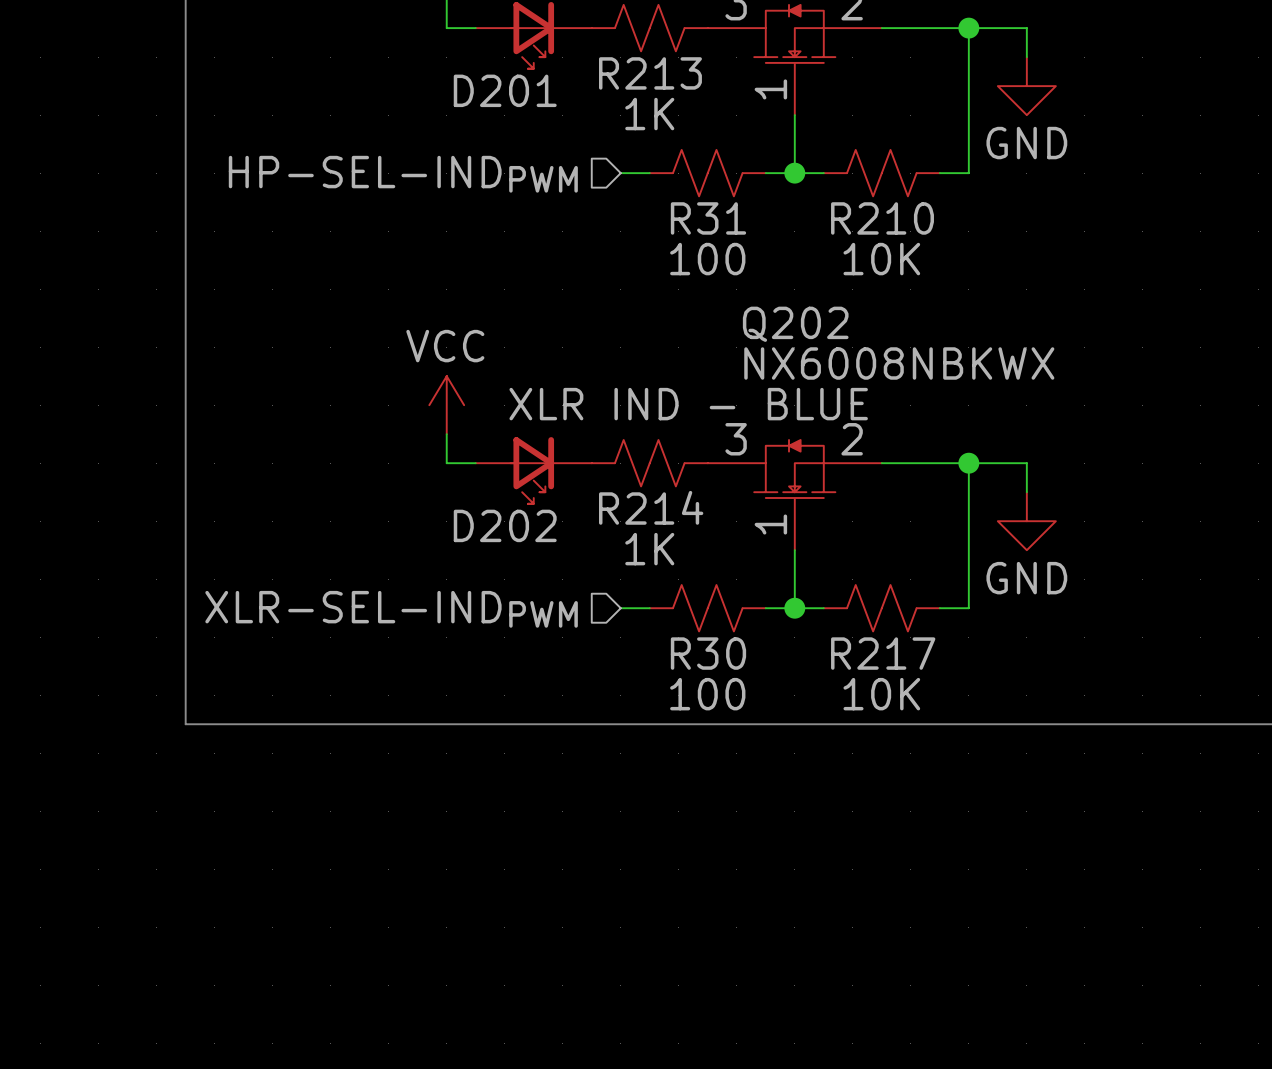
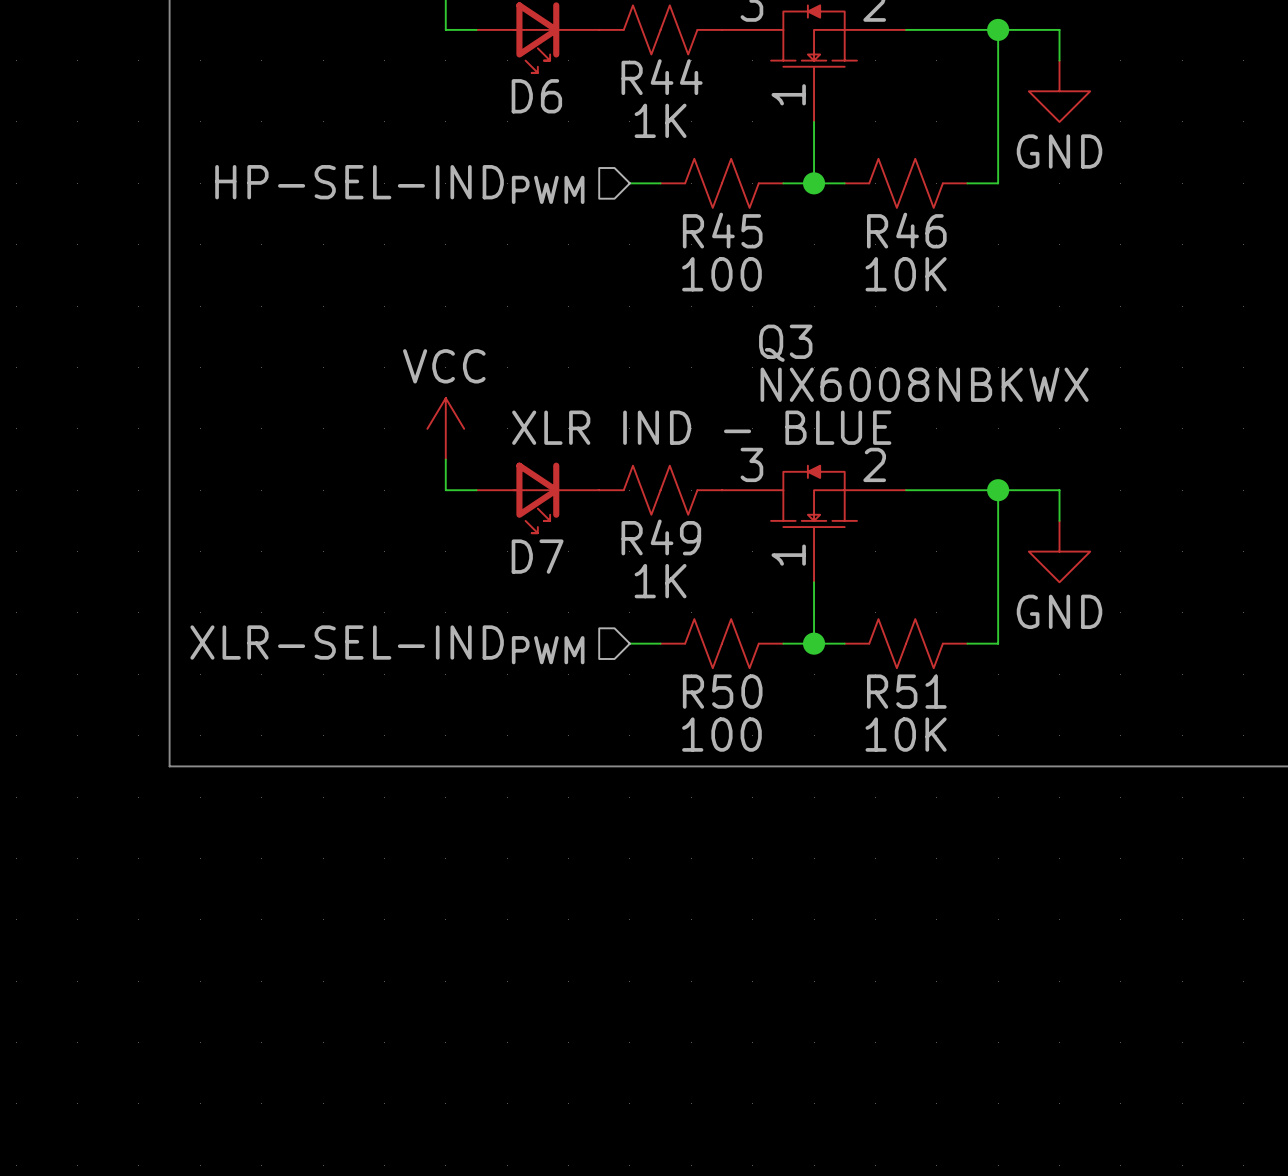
R213 name: R213 (650, 73) -> R44 (662, 77)
D201 name: D201 (505, 90) -> D6 (536, 96)
R31 name: R31 (708, 218) -> R45 (722, 230)
R210 name: R210 (882, 218) -> R46 (906, 230)
Q202 name: Q202 (795, 324) -> Q3 (785, 343)
R214 name: R214 (651, 507) -> R49 (661, 537)
D202 name: D202 (505, 525) -> D7 (537, 556)
R30 name: R30 (708, 653) -> R50 (722, 691)
R217 name: R217 (883, 653) -> R51 (906, 691)

